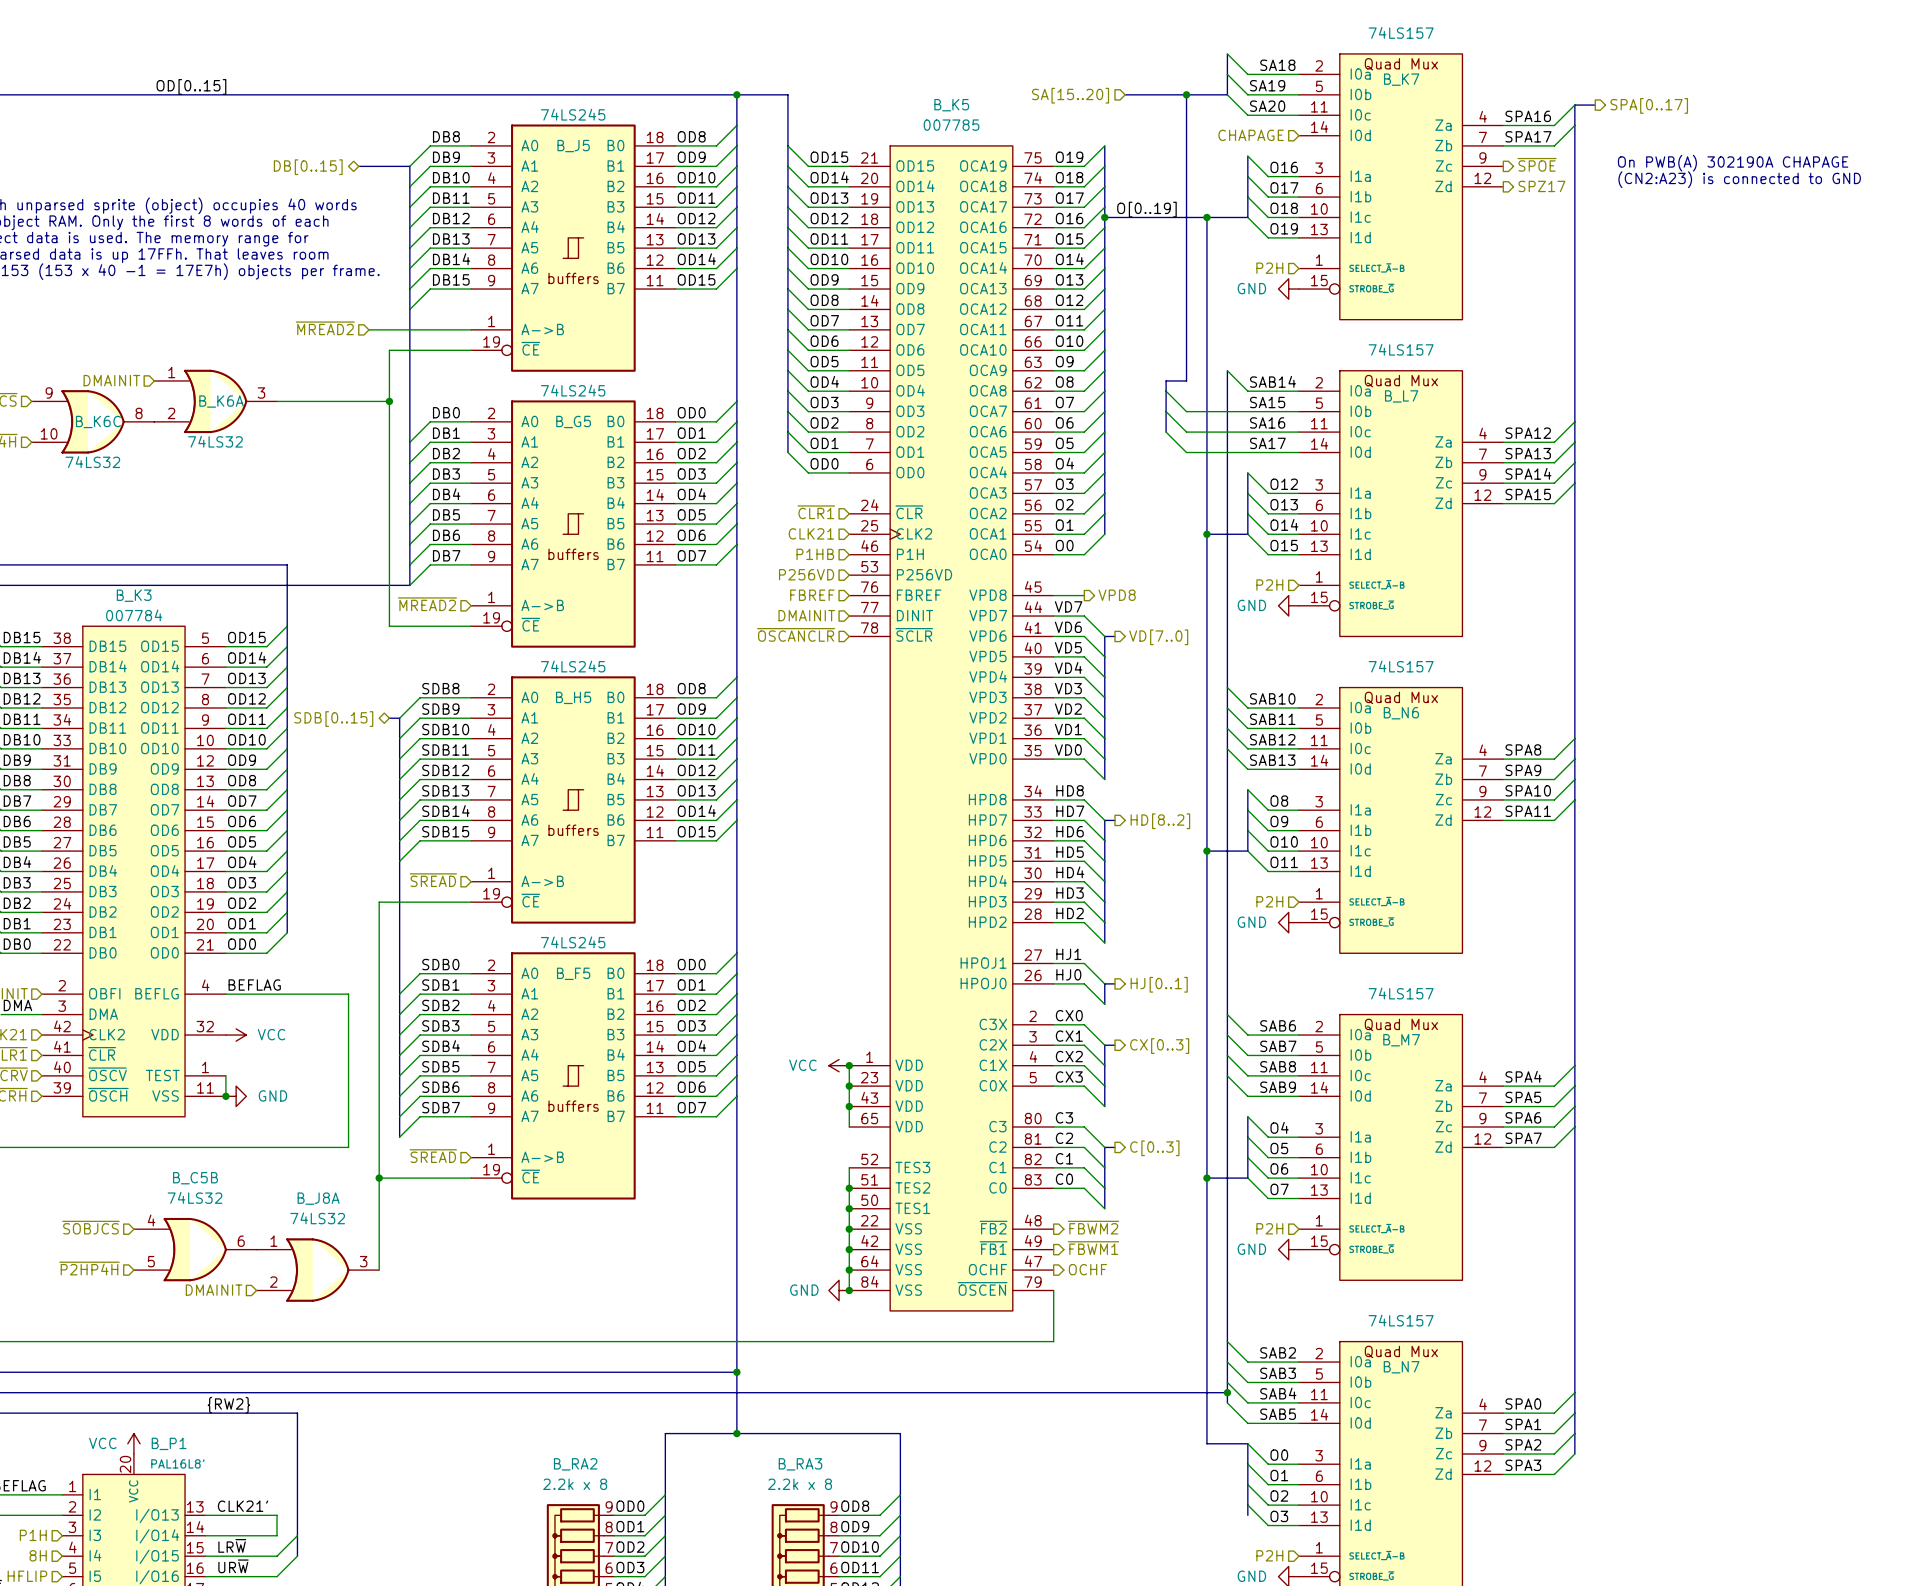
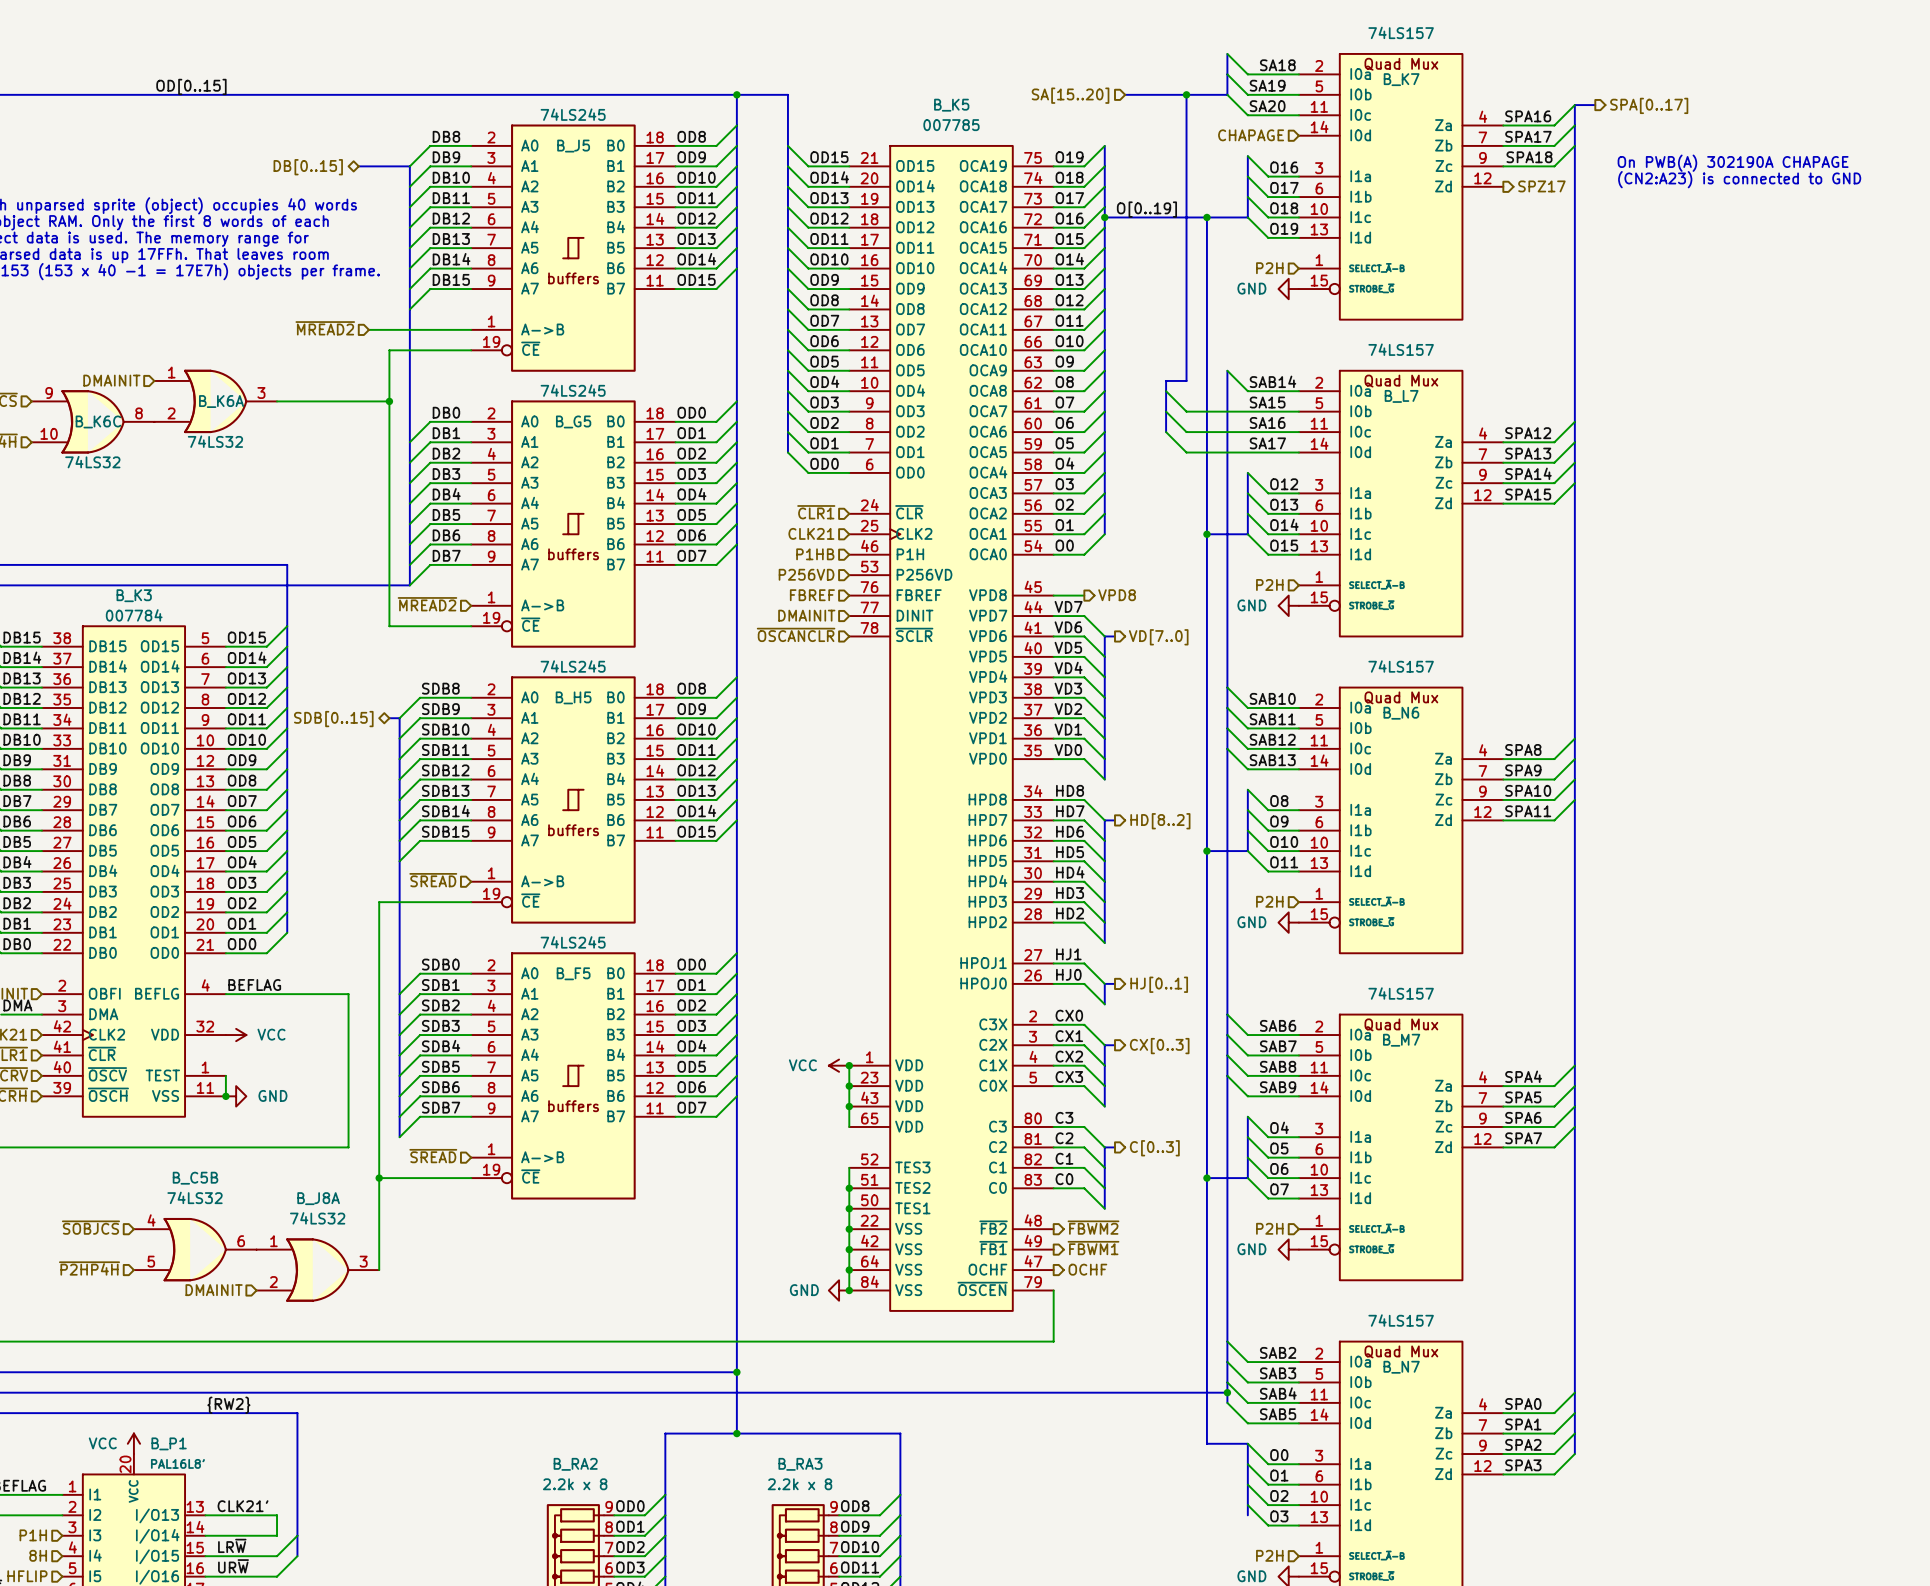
wire: none -> (1574, 145) (1554, 166) (1503, 166)
label: none -> SPA18 (1529, 157)
hierarchical label: ~{SPOE} (1537, 164) -> none

